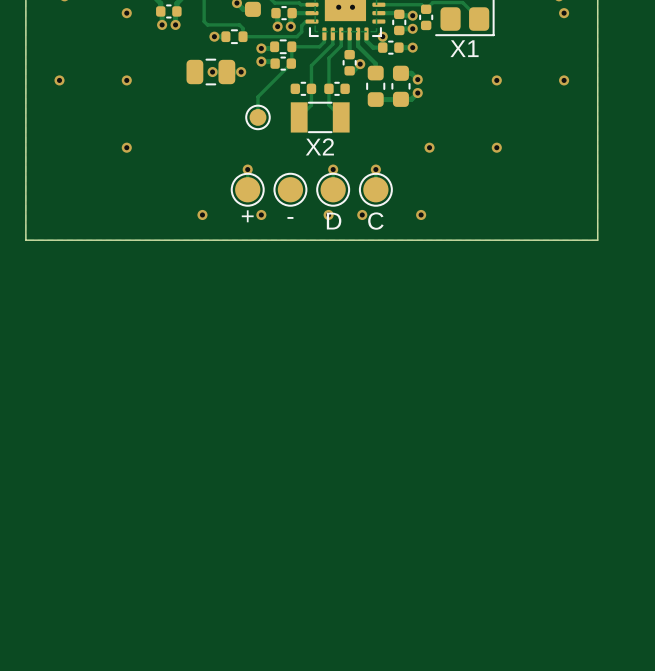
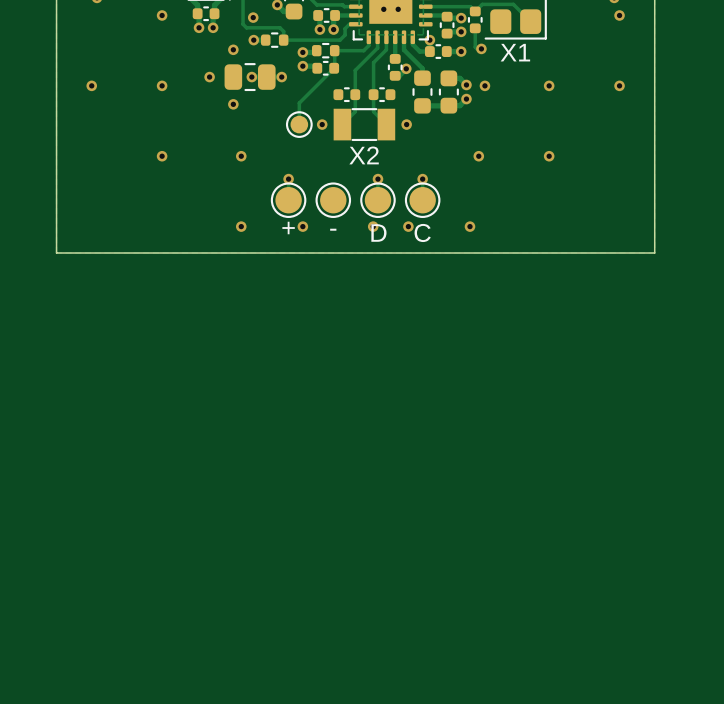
via: none -> (253, 17)
track: none -> (475, 28) (475, 47) (481, 48)
via: none -> (233, 49)
via: none -> (481, 48)
via: none -> (209, 77)
via: none -> (484, 85)
via: none -> (233, 104)
via: none -> (322, 124)
via: none -> (406, 124)
via: none -> (241, 156)

